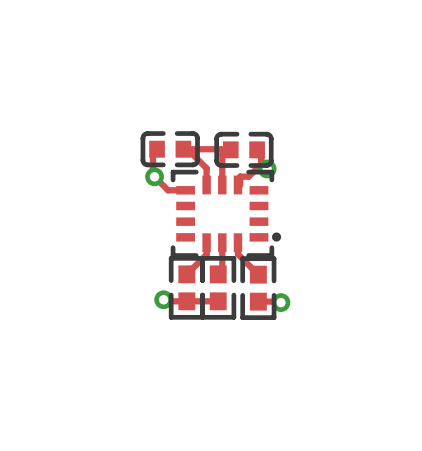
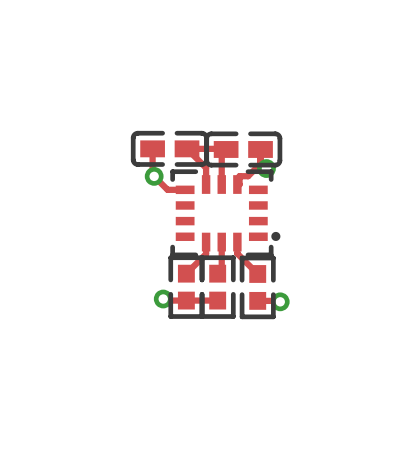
part footprint: [140, 131, 200, 168] -> [130, 130, 209, 167]
part footprint: [214, 131, 274, 168] -> [204, 131, 283, 168]

